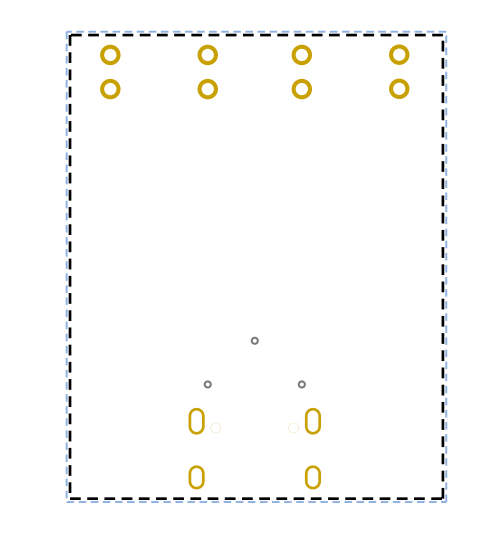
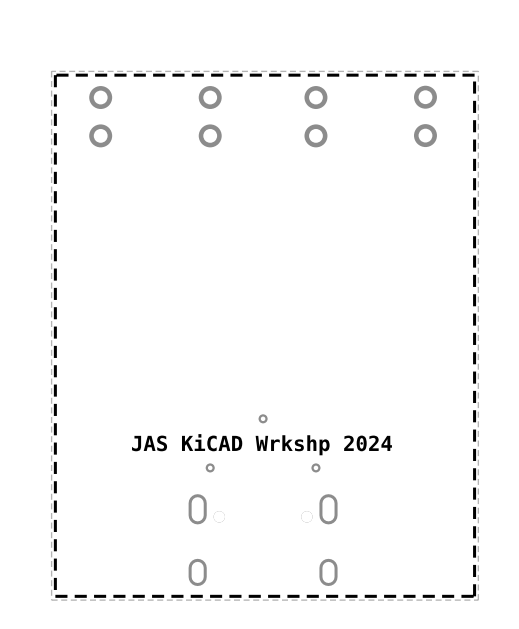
text: none -> JAS KiCAD Wrkshp 2024 (261, 444)

